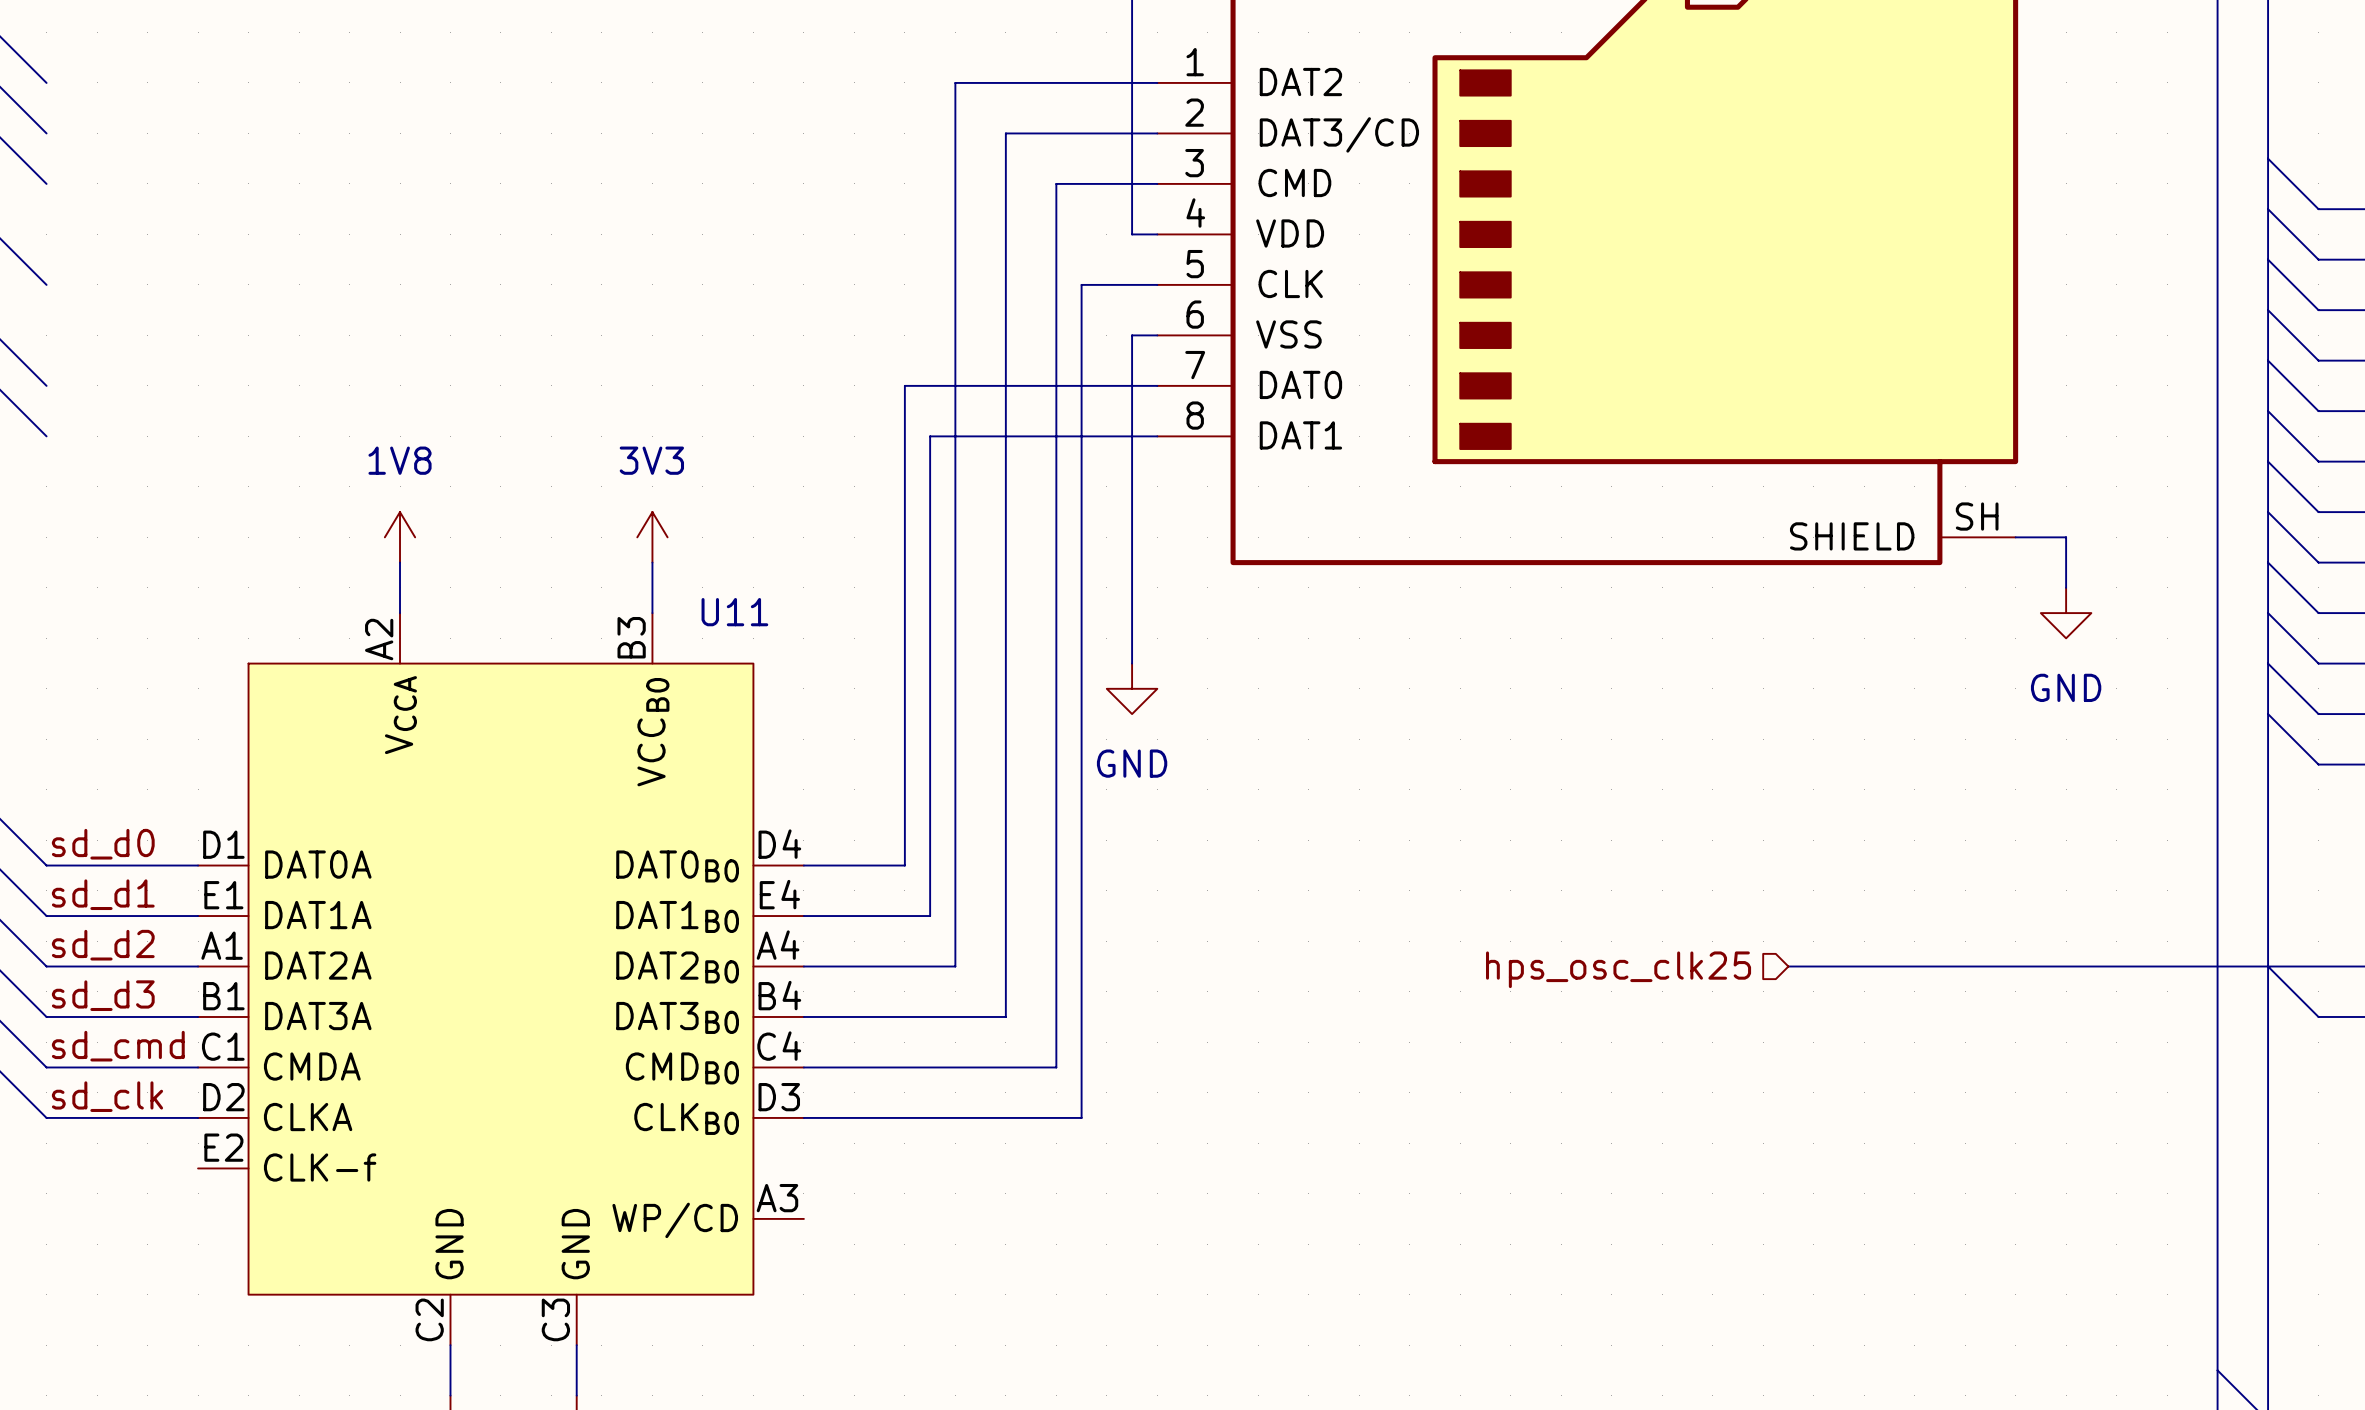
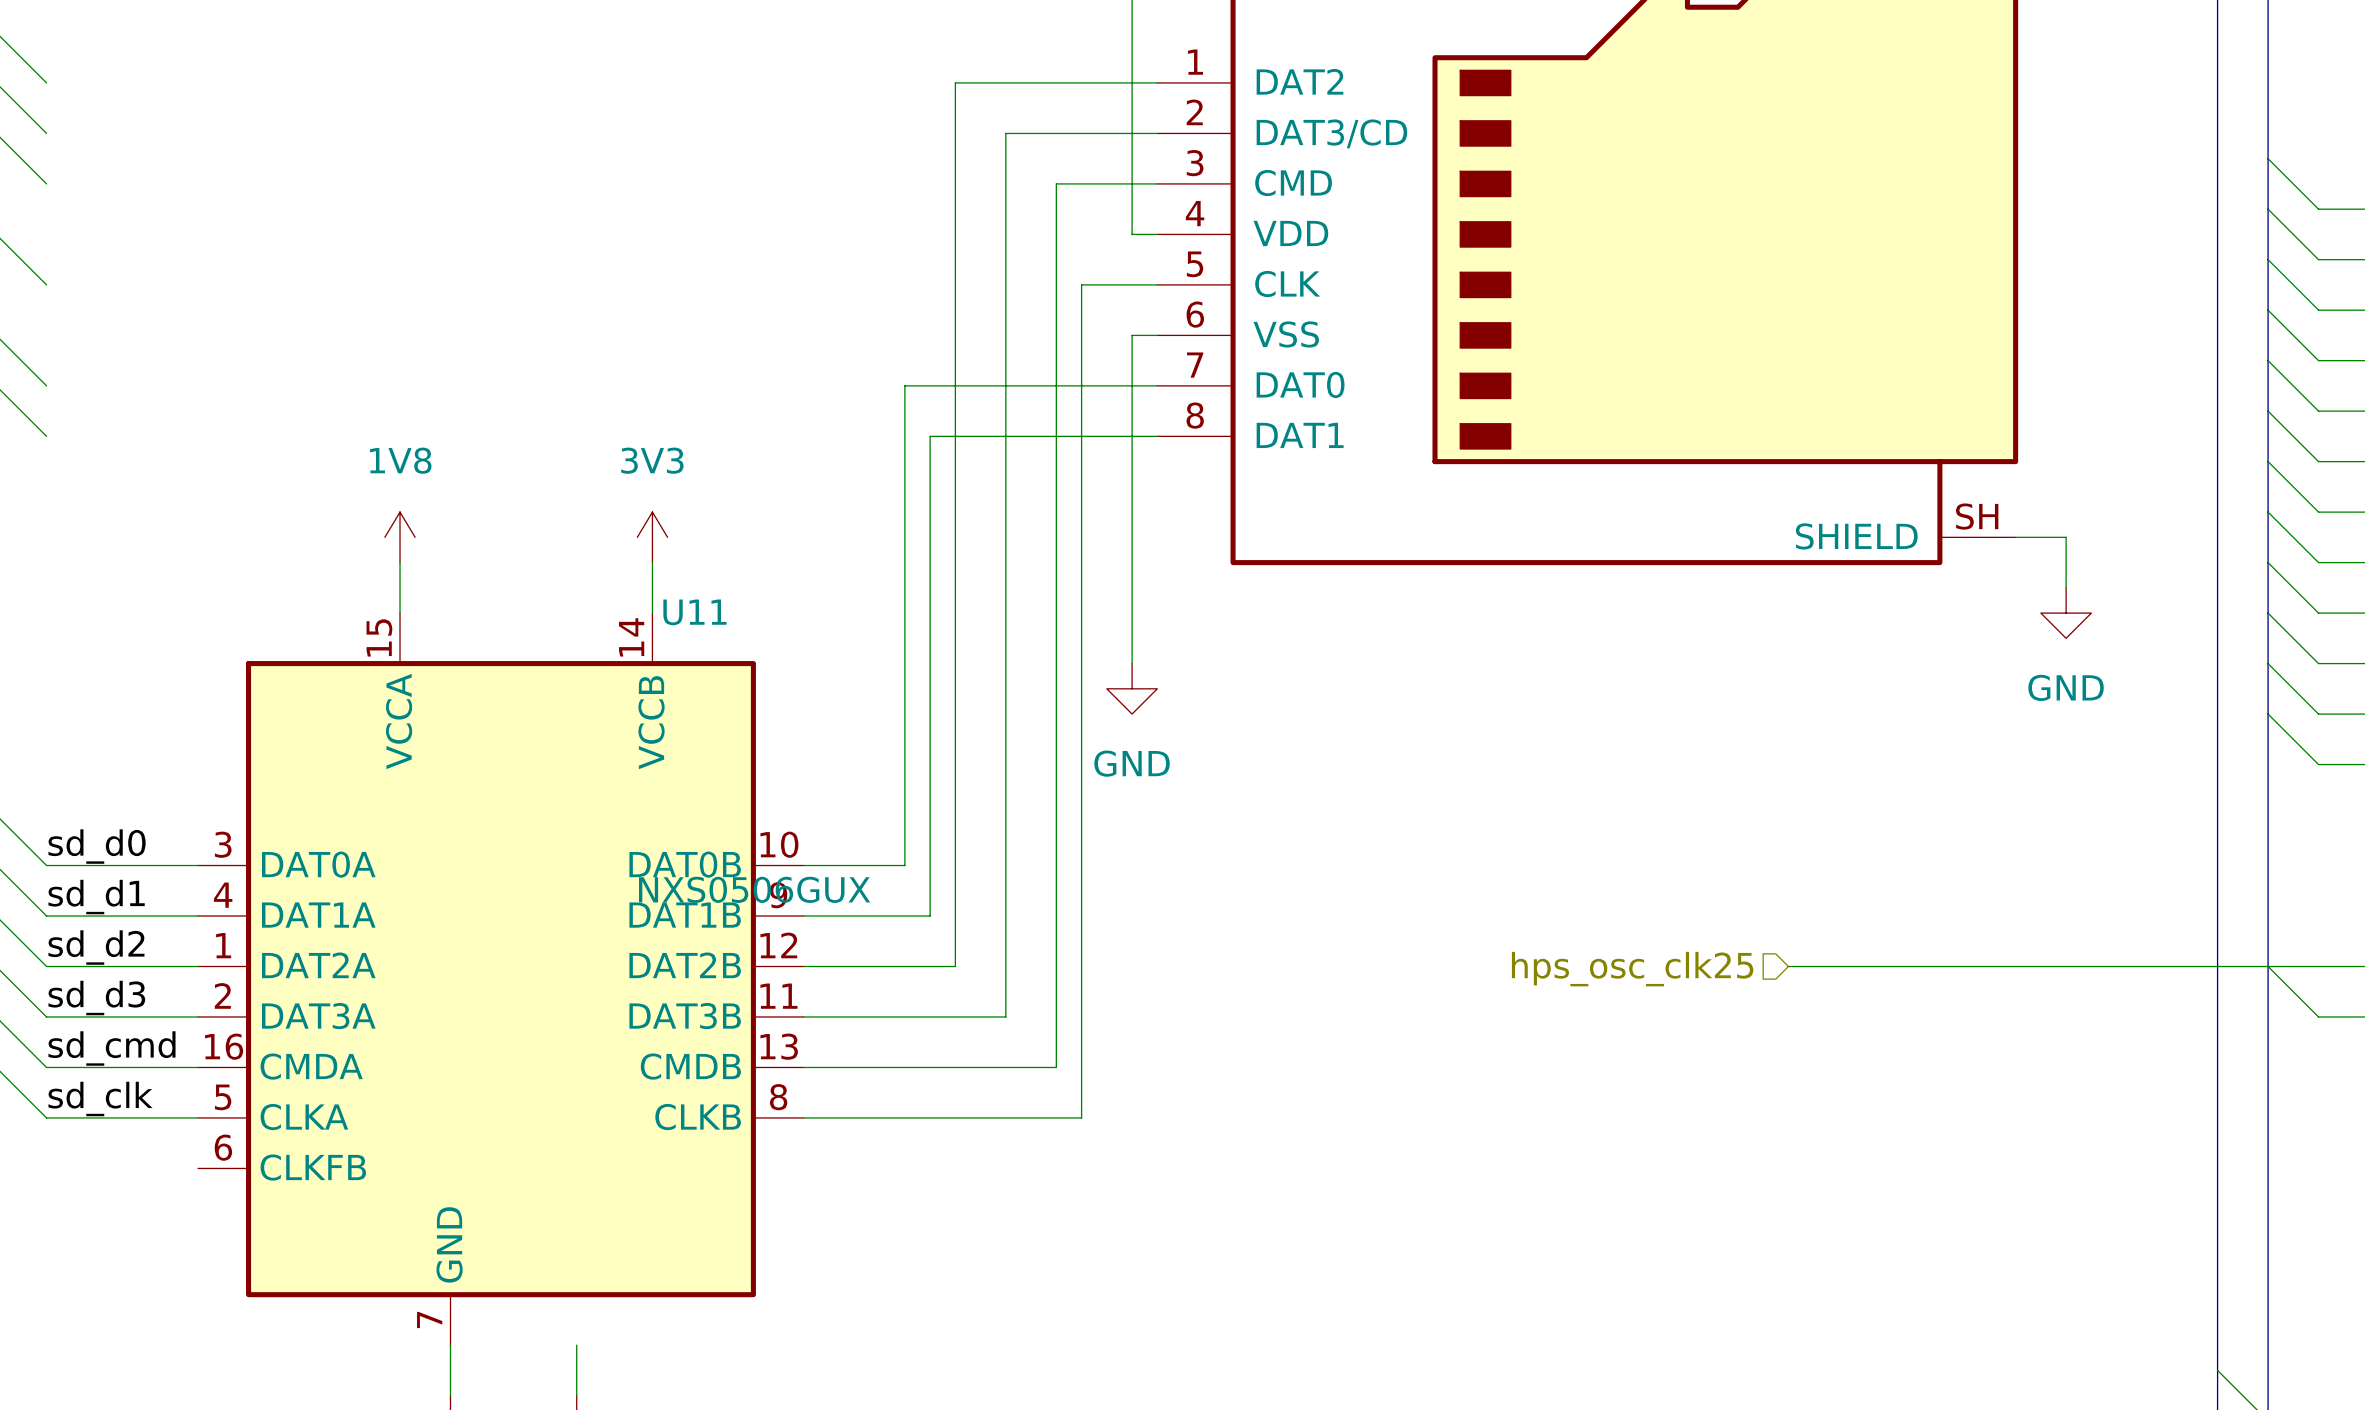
U11 name position: U11 (734, 612) -> U11 (694, 612)
U11 symbol: [198, 613, 804, 1346] -> [198, 613, 804, 1346]
U11 value: none -> NXS0506GUX (754, 889)

